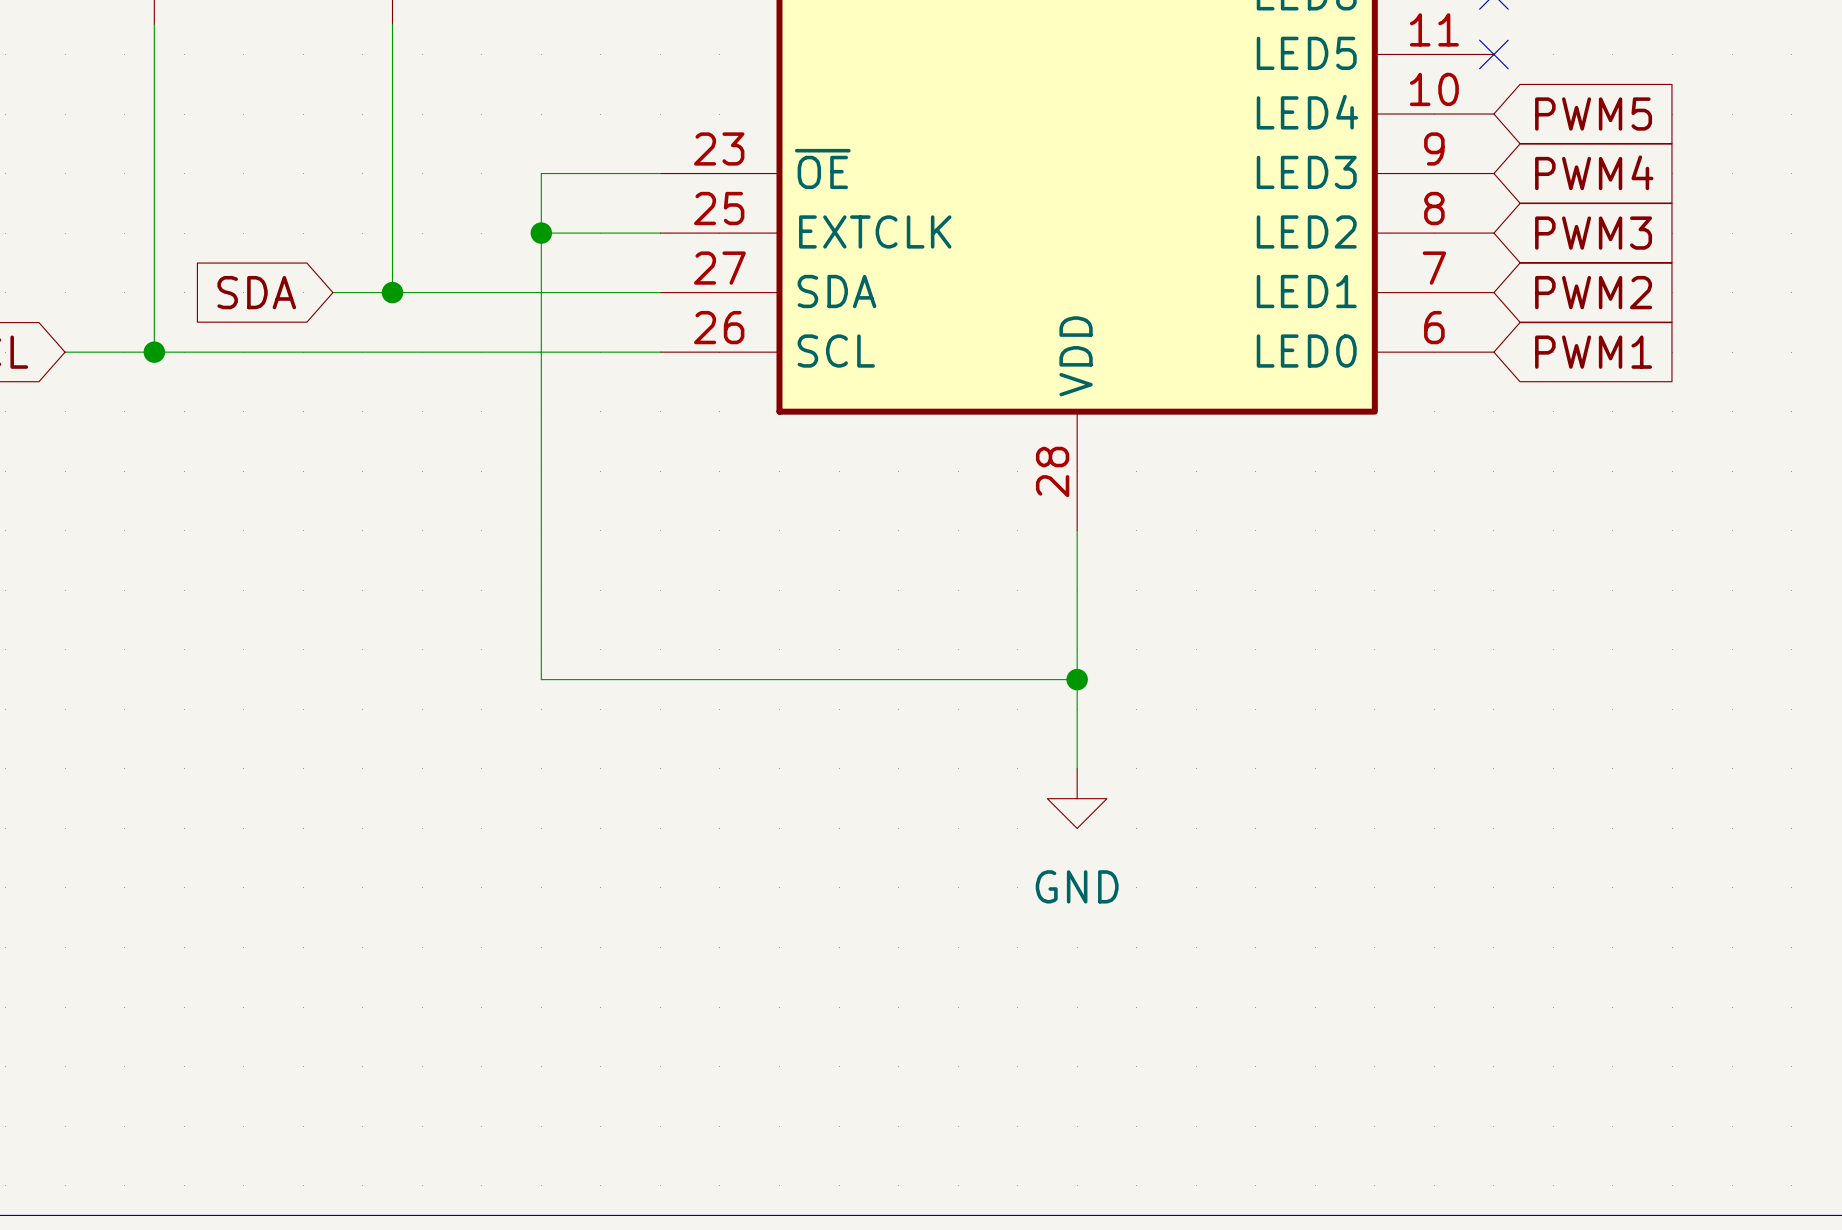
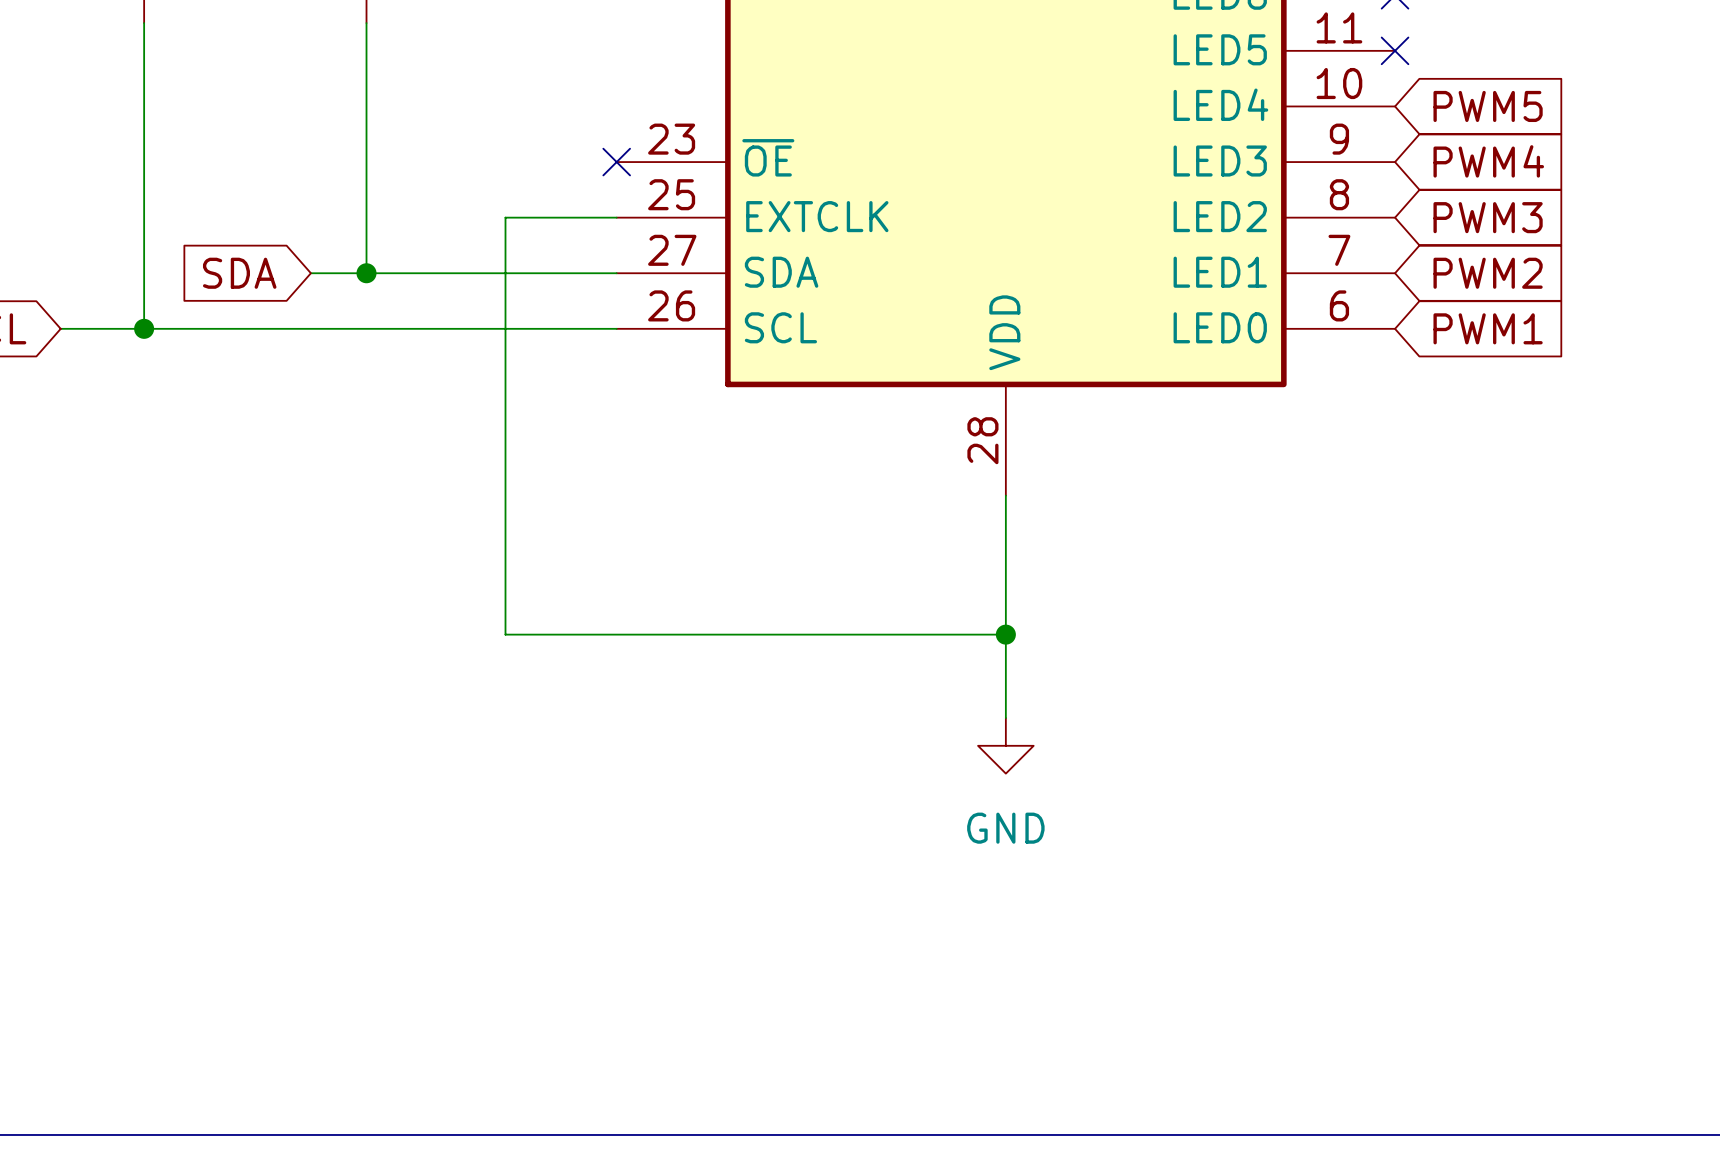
wire: (660, 173) (541, 173) (541, 233) -> none
no-connect mark: none -> (616, 162)
junction: (541, 233) -> none

